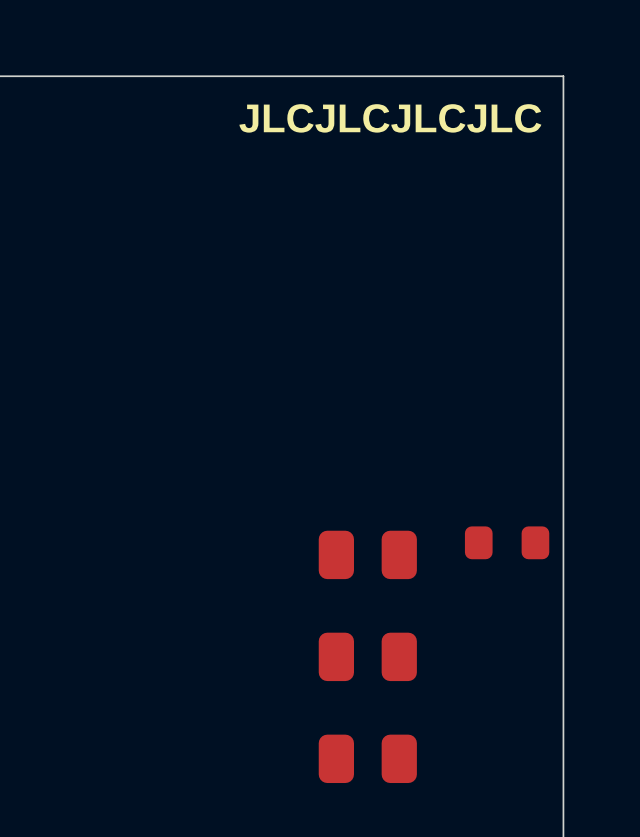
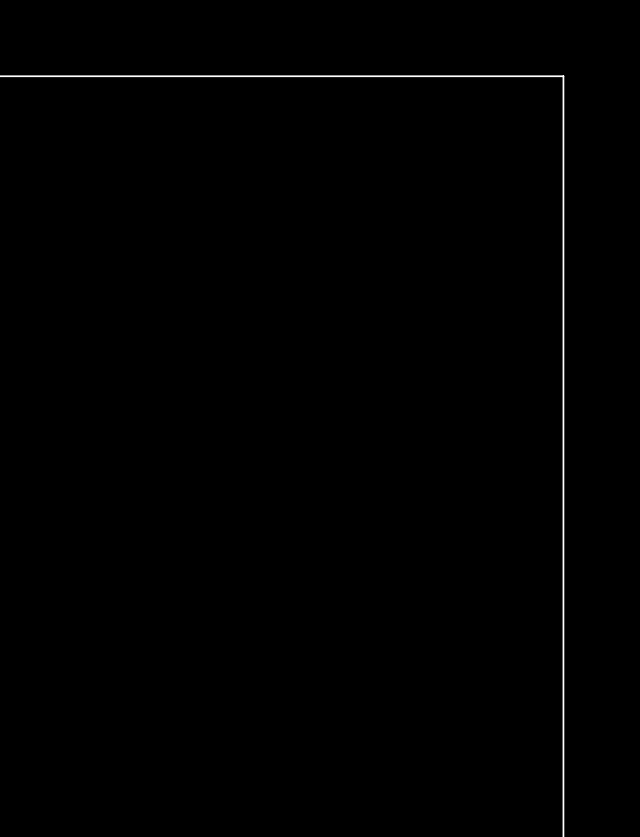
drawing: [239, 104, 542, 133] -> none
part: (507, 542) -> none
part: (367, 554) -> none
part: (367, 656) -> none
part: (367, 758) -> none

